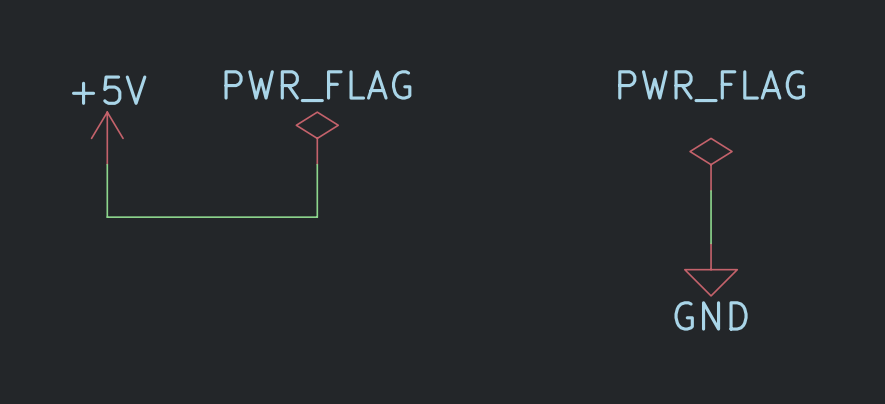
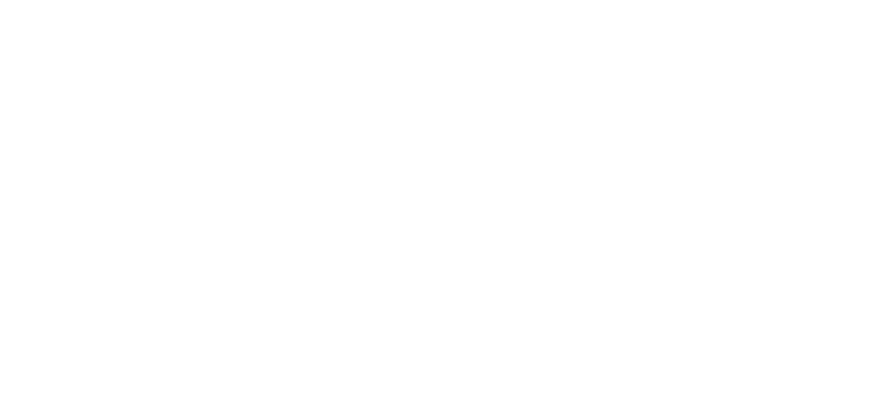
power symbol: +5V (107, 138) -> none
power symbol: PWR_FLAG (317, 138) -> none
wire: (107, 164) (107, 217) (317, 217) (317, 164) -> none
power symbol: PWR_FLAG (711, 164) -> none
wire: (711, 190) (711, 243) -> none
power symbol: GND (711, 269) -> none

